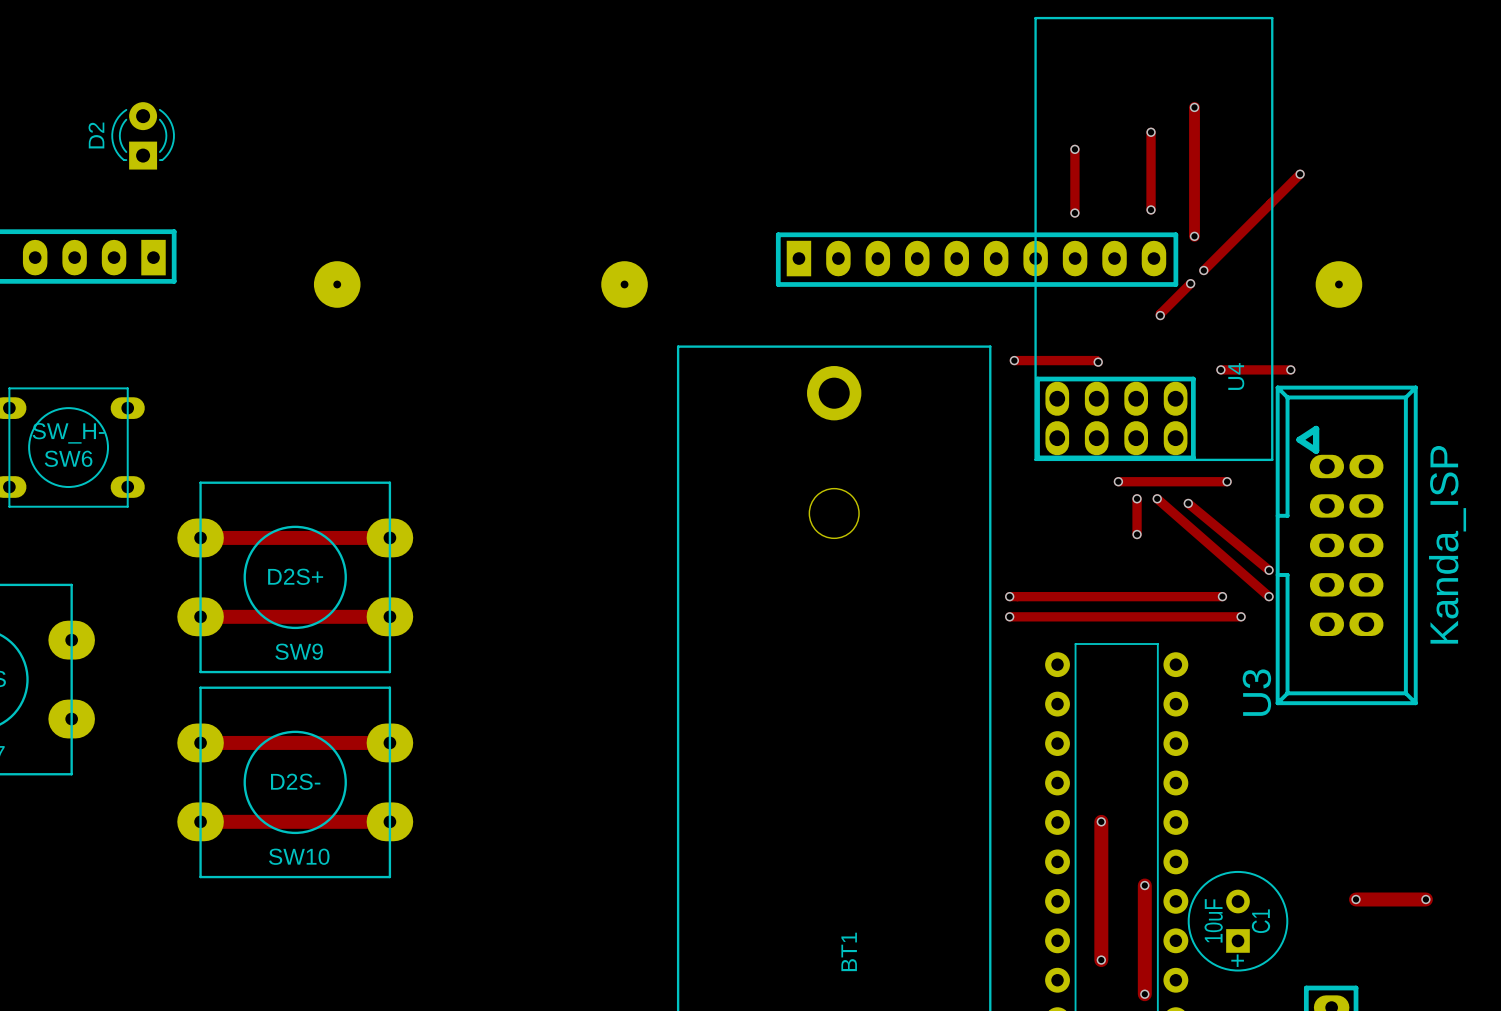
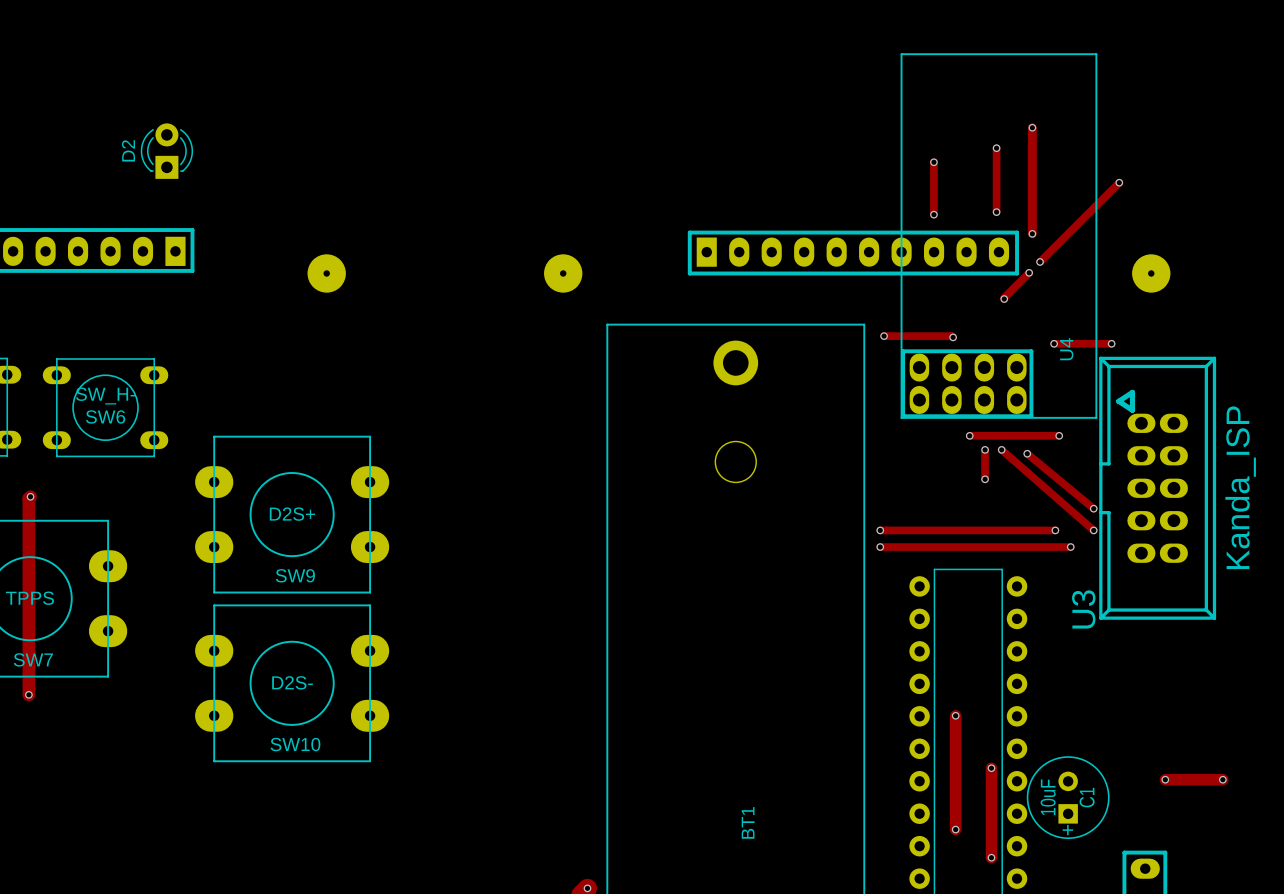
track: (200, 537) (389, 537) -> none
track: (200, 616) (389, 616) -> none
track: (200, 742) (389, 742) -> none
track: (200, 821) (389, 821) -> none

